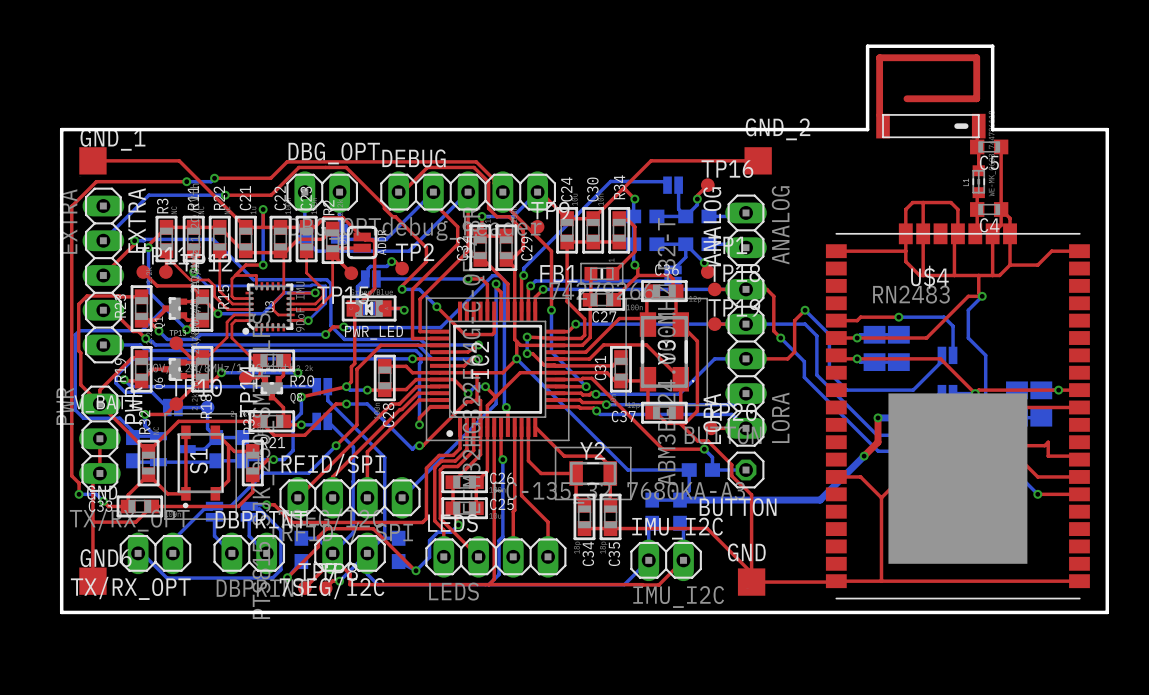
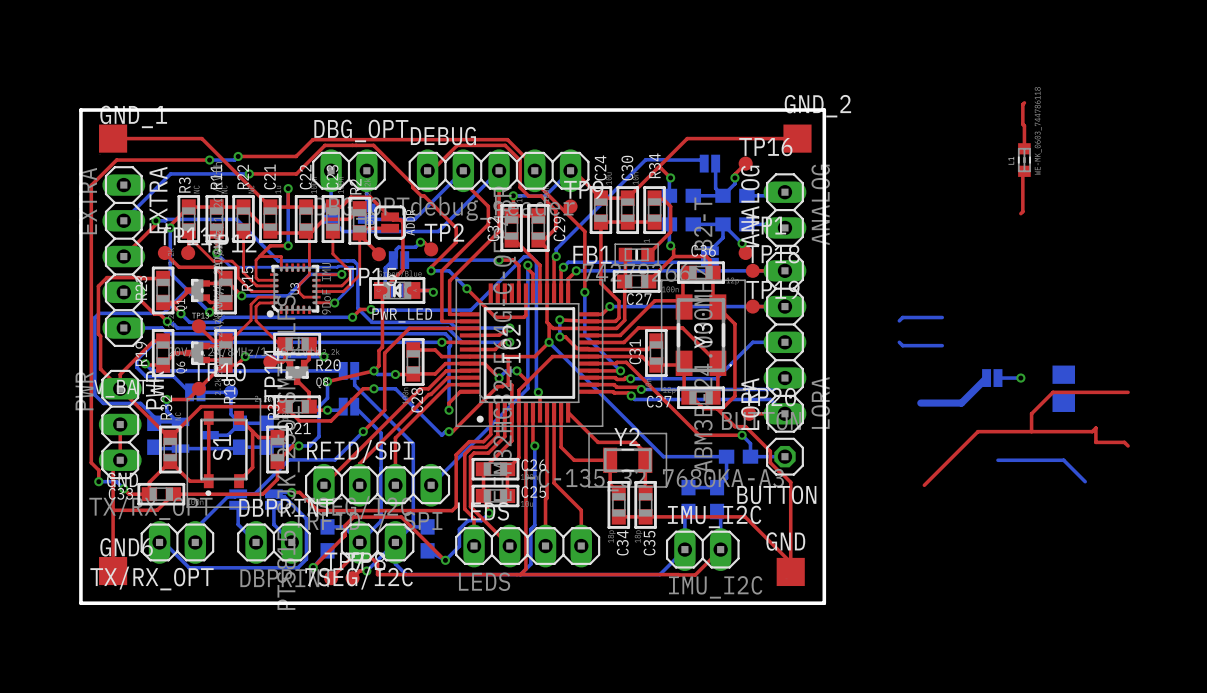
part: (930, 96) -> none
board edge: (61, 133) (61, 129) (867, 129) (867, 46) (992, 46) (992, 129) (1107, 129) (1107, 612) (784, 612) -> (80, 110) (824, 110) (824, 603)
C5: (989, 146) -> none
top track: (1001, 146) (1001, 225) (992, 233) (992, 275) -> none
top track: (923, 202) (923, 275) -> none
C4: (989, 209) -> none
top track: (1001, 209) (1010, 218) (1010, 265) -> none
top track: (836, 251) (905, 251) -> none
top track: (1079, 251) (1051, 251) (1037, 265) (1010, 265) -> none
top track: (1010, 265) (999, 275) (919, 275) (905, 261) (905, 209) (912, 202) (950, 202) (957, 209) (957, 233) (954, 237) (954, 275) -> none
top track: (978, 275) (978, 292) (982, 296) (968, 296) (926, 338) (836, 338) -> none
top track: (746, 289) (766, 289) (773, 296) (773, 331) (780, 338) -> none
bottom track: (982, 296) (968, 310) (968, 338) (985, 355) (985, 428) (996, 417) (1041, 417) -> none
via: (982, 296) -> none
top track: (805, 310) (794, 320) (794, 351) (787, 358) (746, 358) -> none
bottom track: (805, 310) (829, 334) (829, 372) (846, 390) (913, 390) (941, 361) (941, 355) -> none
via: (805, 310) -> none
top track: (898, 317) (860, 317) (857, 320) (836, 320) -> none
bottom track: (898, 317) (944, 317) (953, 326) (953, 355) -> none
via: (898, 317) -> none
bottom track: (746, 324) (805, 324) (816, 335) (816, 375) (877, 435) (941, 435) -> none
bottom track: (780, 338) (804, 361) (804, 377) (878, 451) (919, 451) (941, 473) -> none
via: (780, 338) -> none
via: (857, 338) -> none
part: (874, 348) -> none
part: (898, 348) -> none
top track: (836, 355) (839, 358) (940, 358) (975, 393) (978, 390) (1079, 390) -> none
part: (947, 355) -> none
via: (857, 358) -> none
via: (1058, 390) -> none
part: (1041, 404) -> none
U$4: RN2483 (957, 411) -> none
top track: (878, 417) (878, 442) (864, 456) -> none
via: (878, 417) -> none
bottom track: (864, 456) (820, 500) (680, 500) -> none
via: (864, 456) -> none
top track: (1020, 459) (1037, 476) (1079, 476) -> none
top track: (836, 476) (860, 476) (881, 497) (881, 581) -> none
top track: (1037, 494) (1079, 494) -> none
via: (1037, 494) -> none
top track: (1079, 581) (751, 582) -> none

